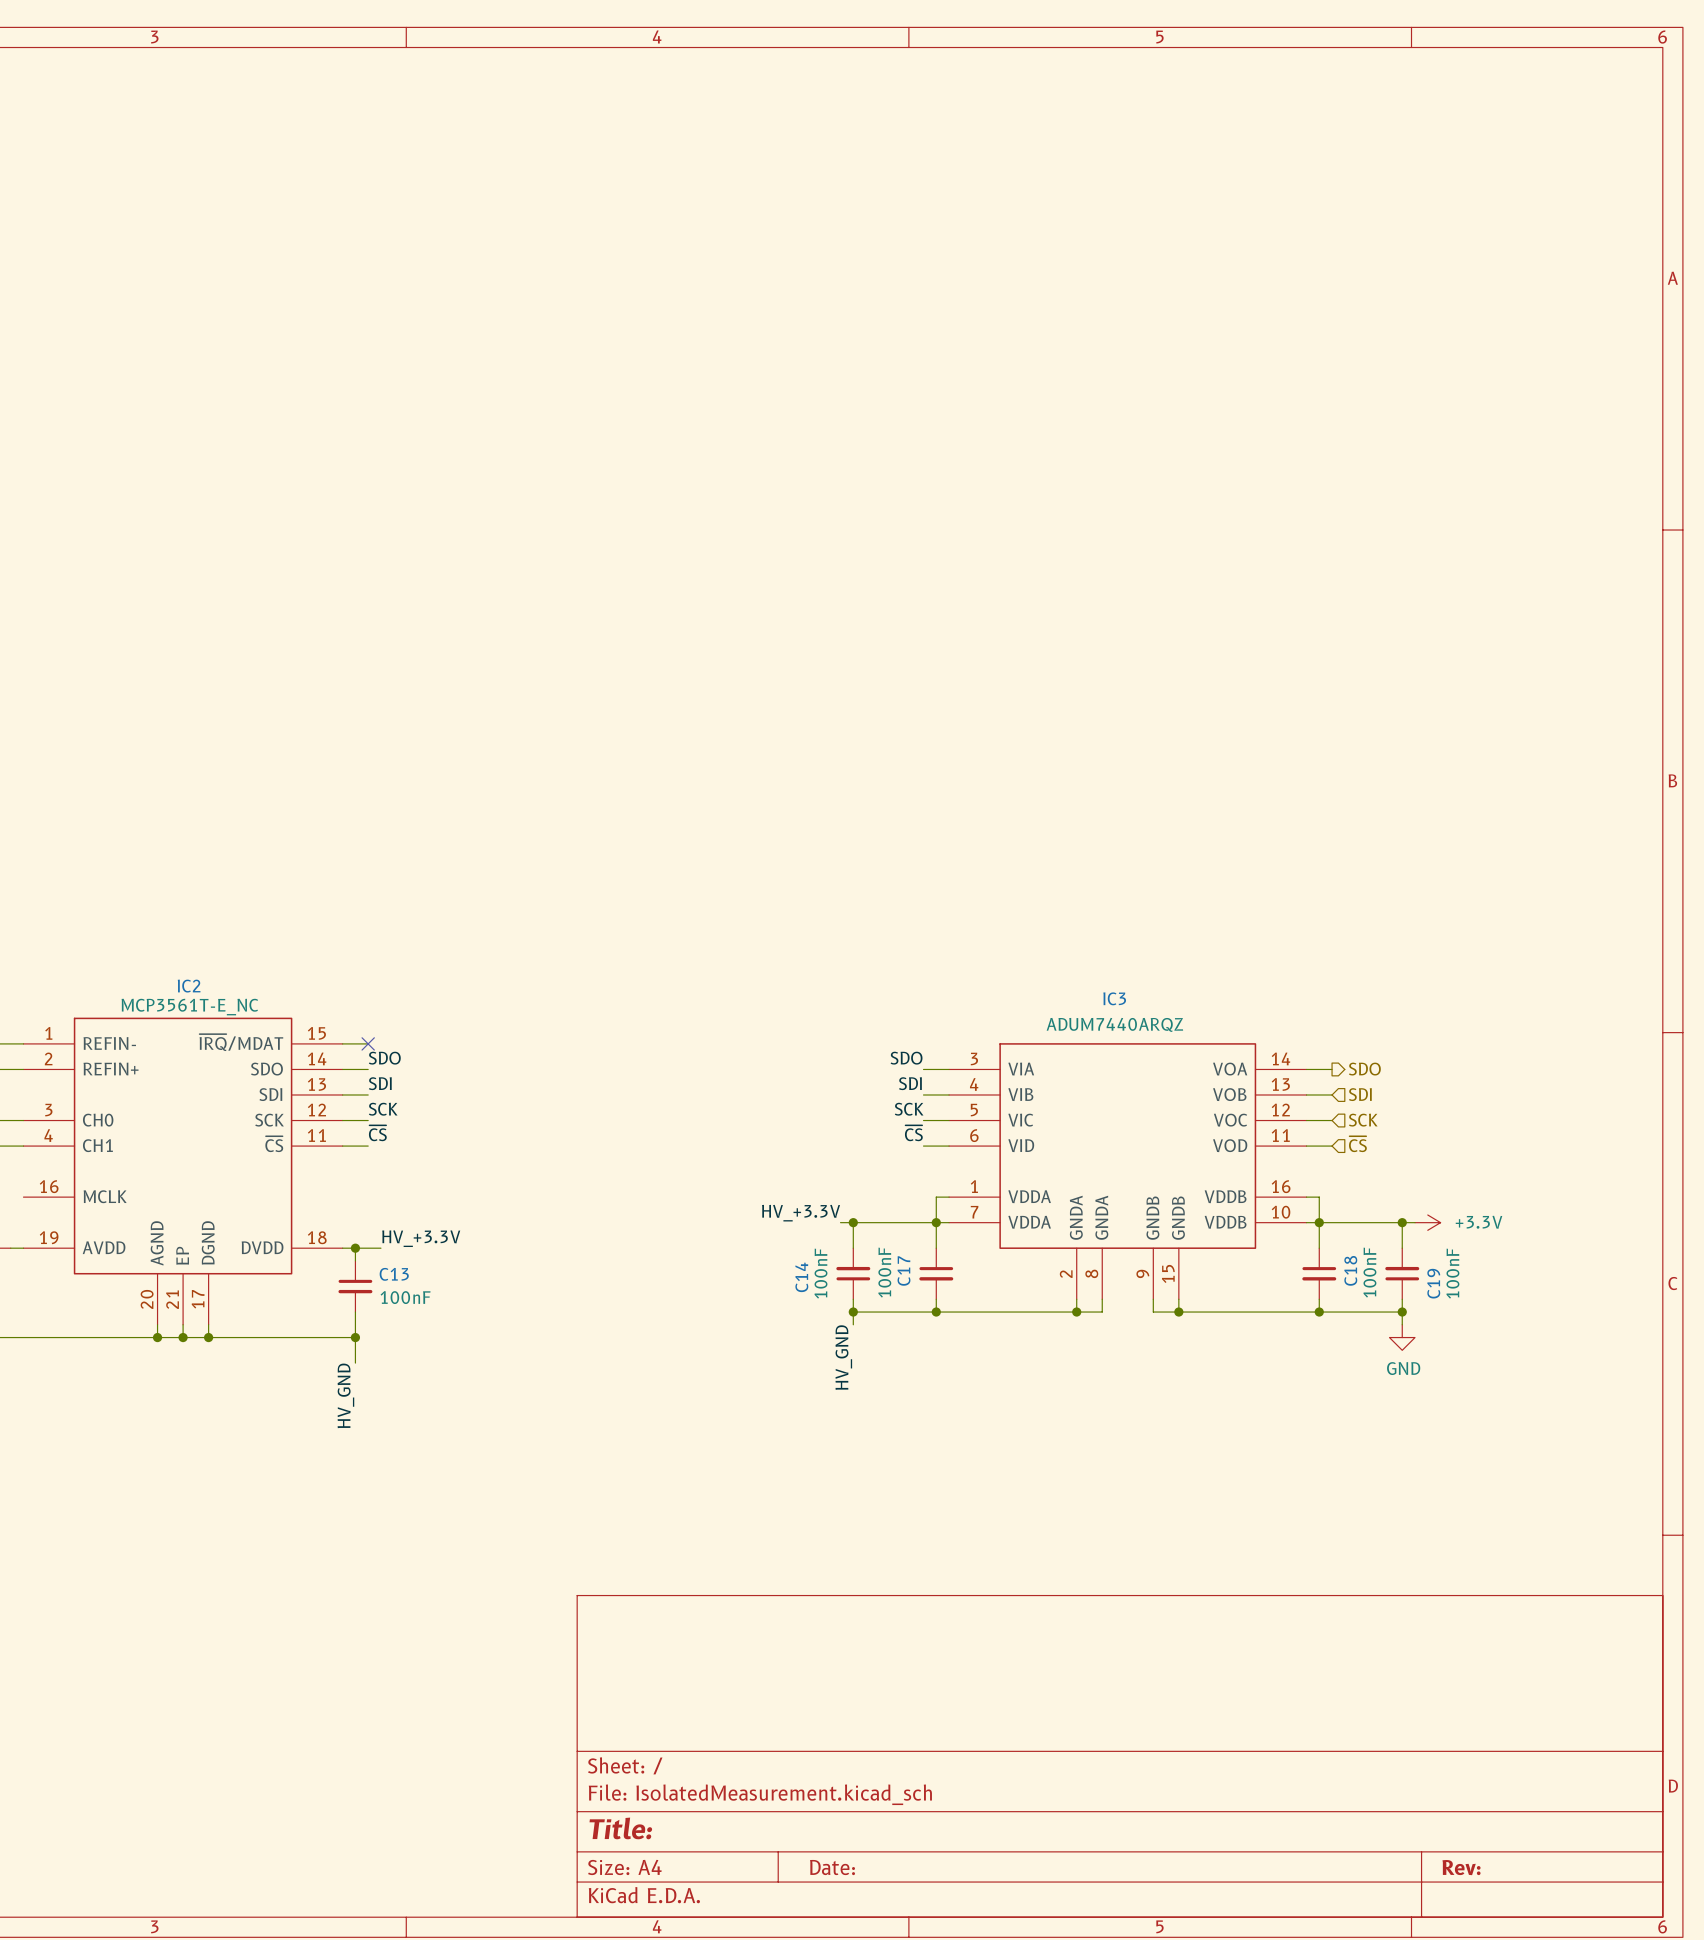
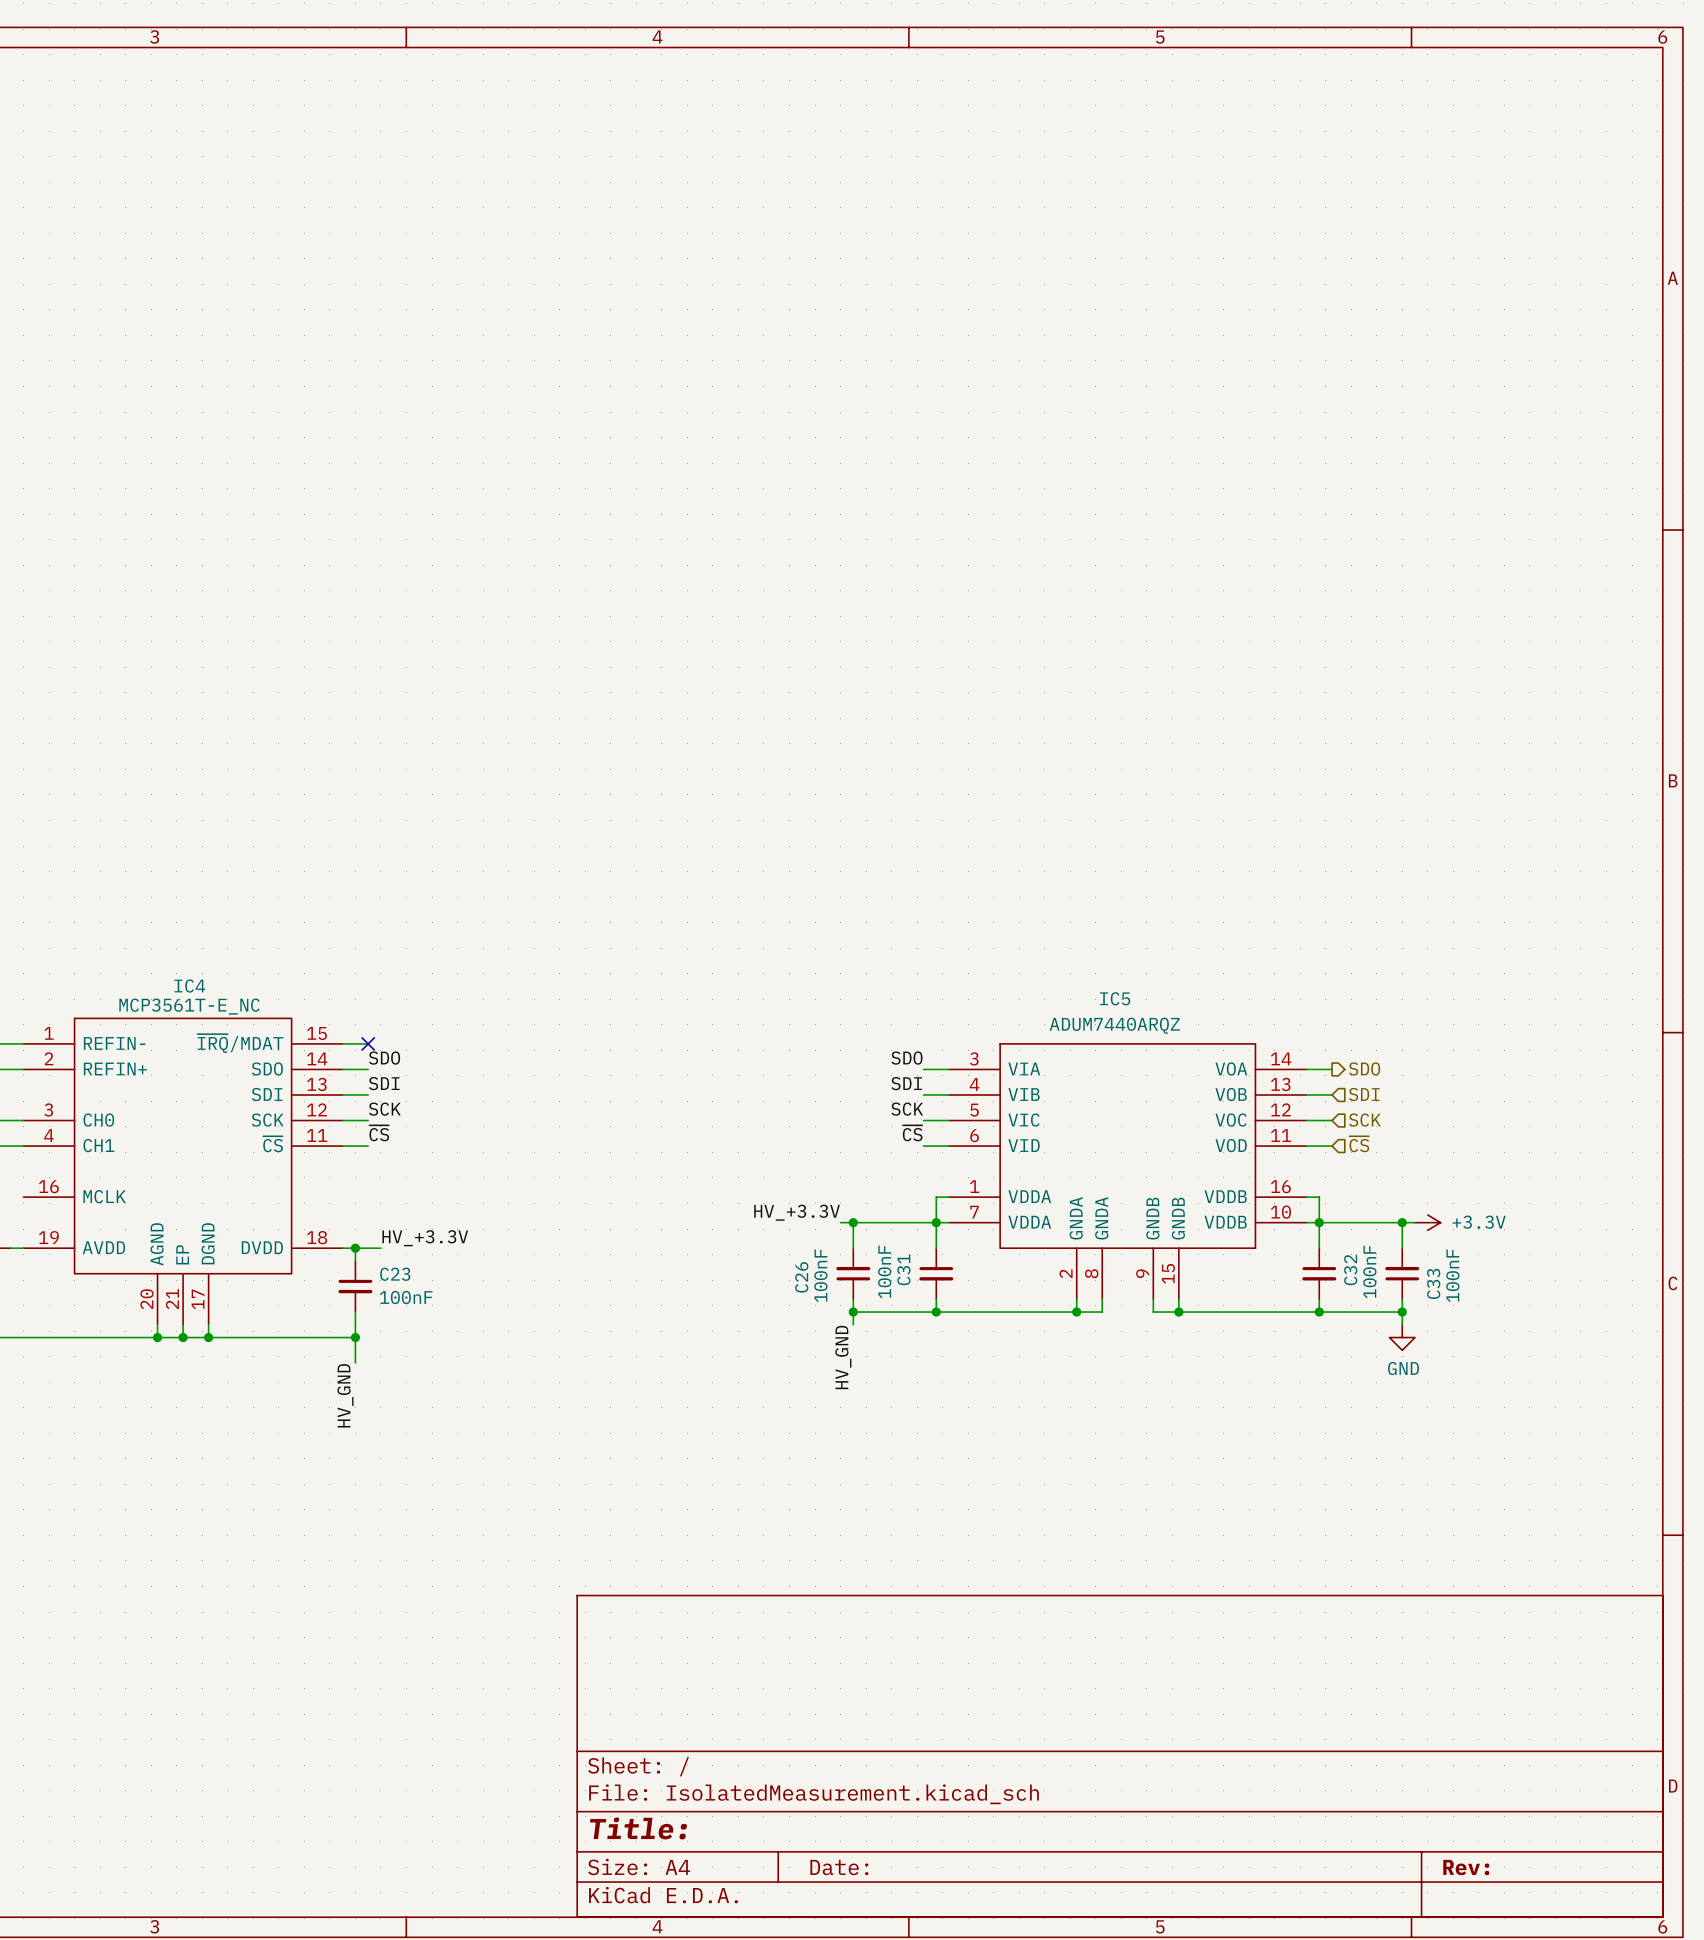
IC2 name: IC2 (189, 986) -> IC4 (189, 986)
IC3 name: IC3 (1114, 998) -> IC5 (1115, 998)
C17 name: C17 (903, 1270) -> C31 (903, 1269)
C18 name: C18 (1350, 1270) -> C32 (1350, 1269)
C13 name: C13 (394, 1274) -> C23 (395, 1274)
C14 name: C14 (801, 1277) -> C26 (801, 1277)
C19 name: C19 (1433, 1283) -> C33 (1433, 1283)

